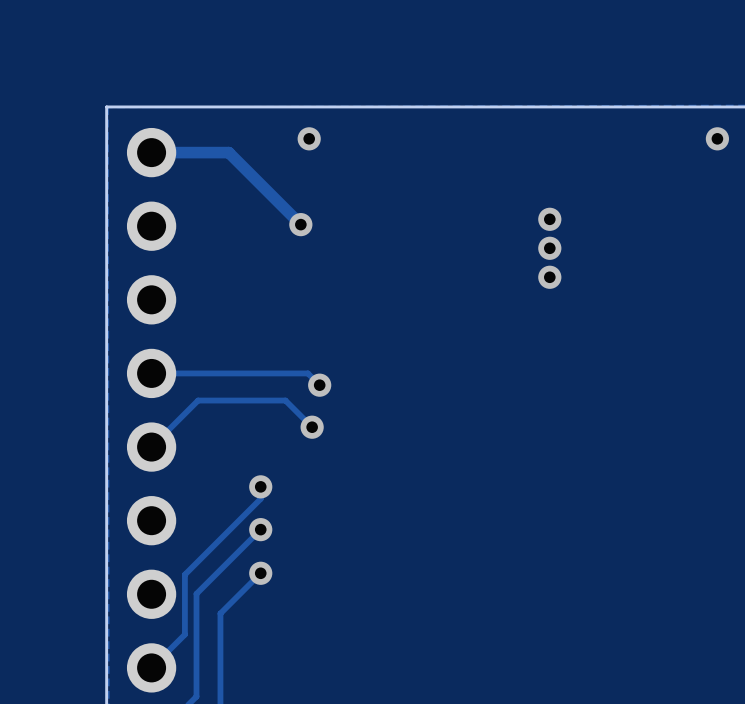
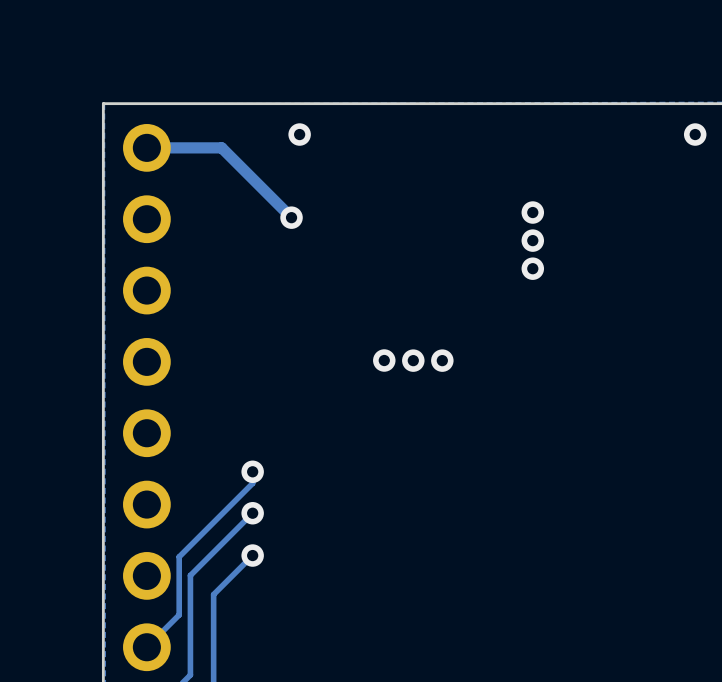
via: none -> (384, 360)
via: none -> (413, 360)
via: none -> (442, 360)
track: (151, 373) (307, 373) (319, 385) -> none
via: (319, 385) -> none
track: (312, 427) (285, 400) (198, 400) (151, 447) -> none
via: (312, 427) -> none

